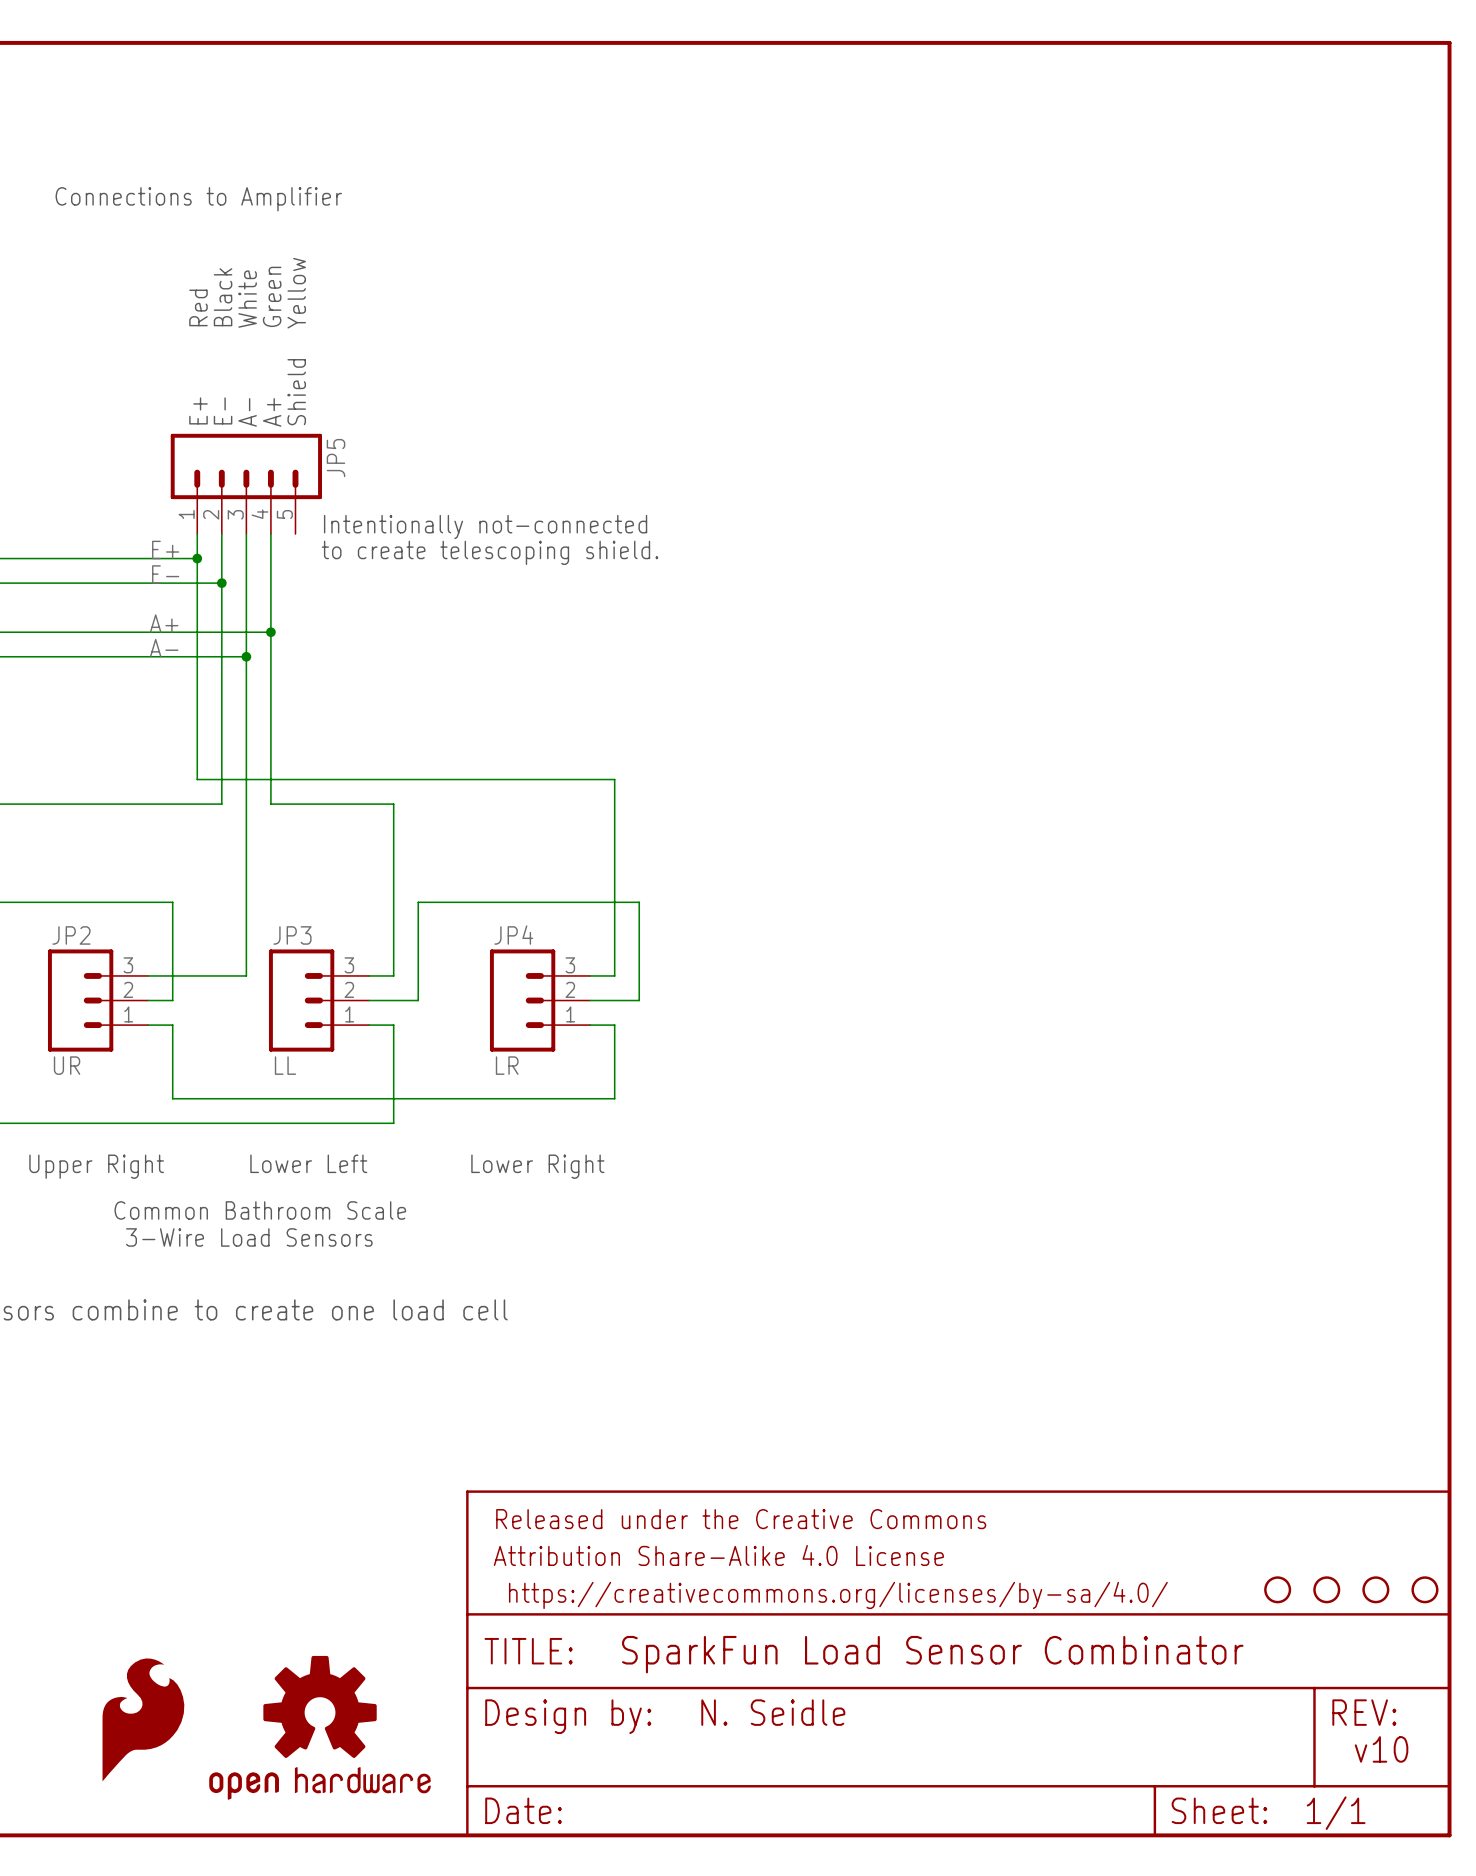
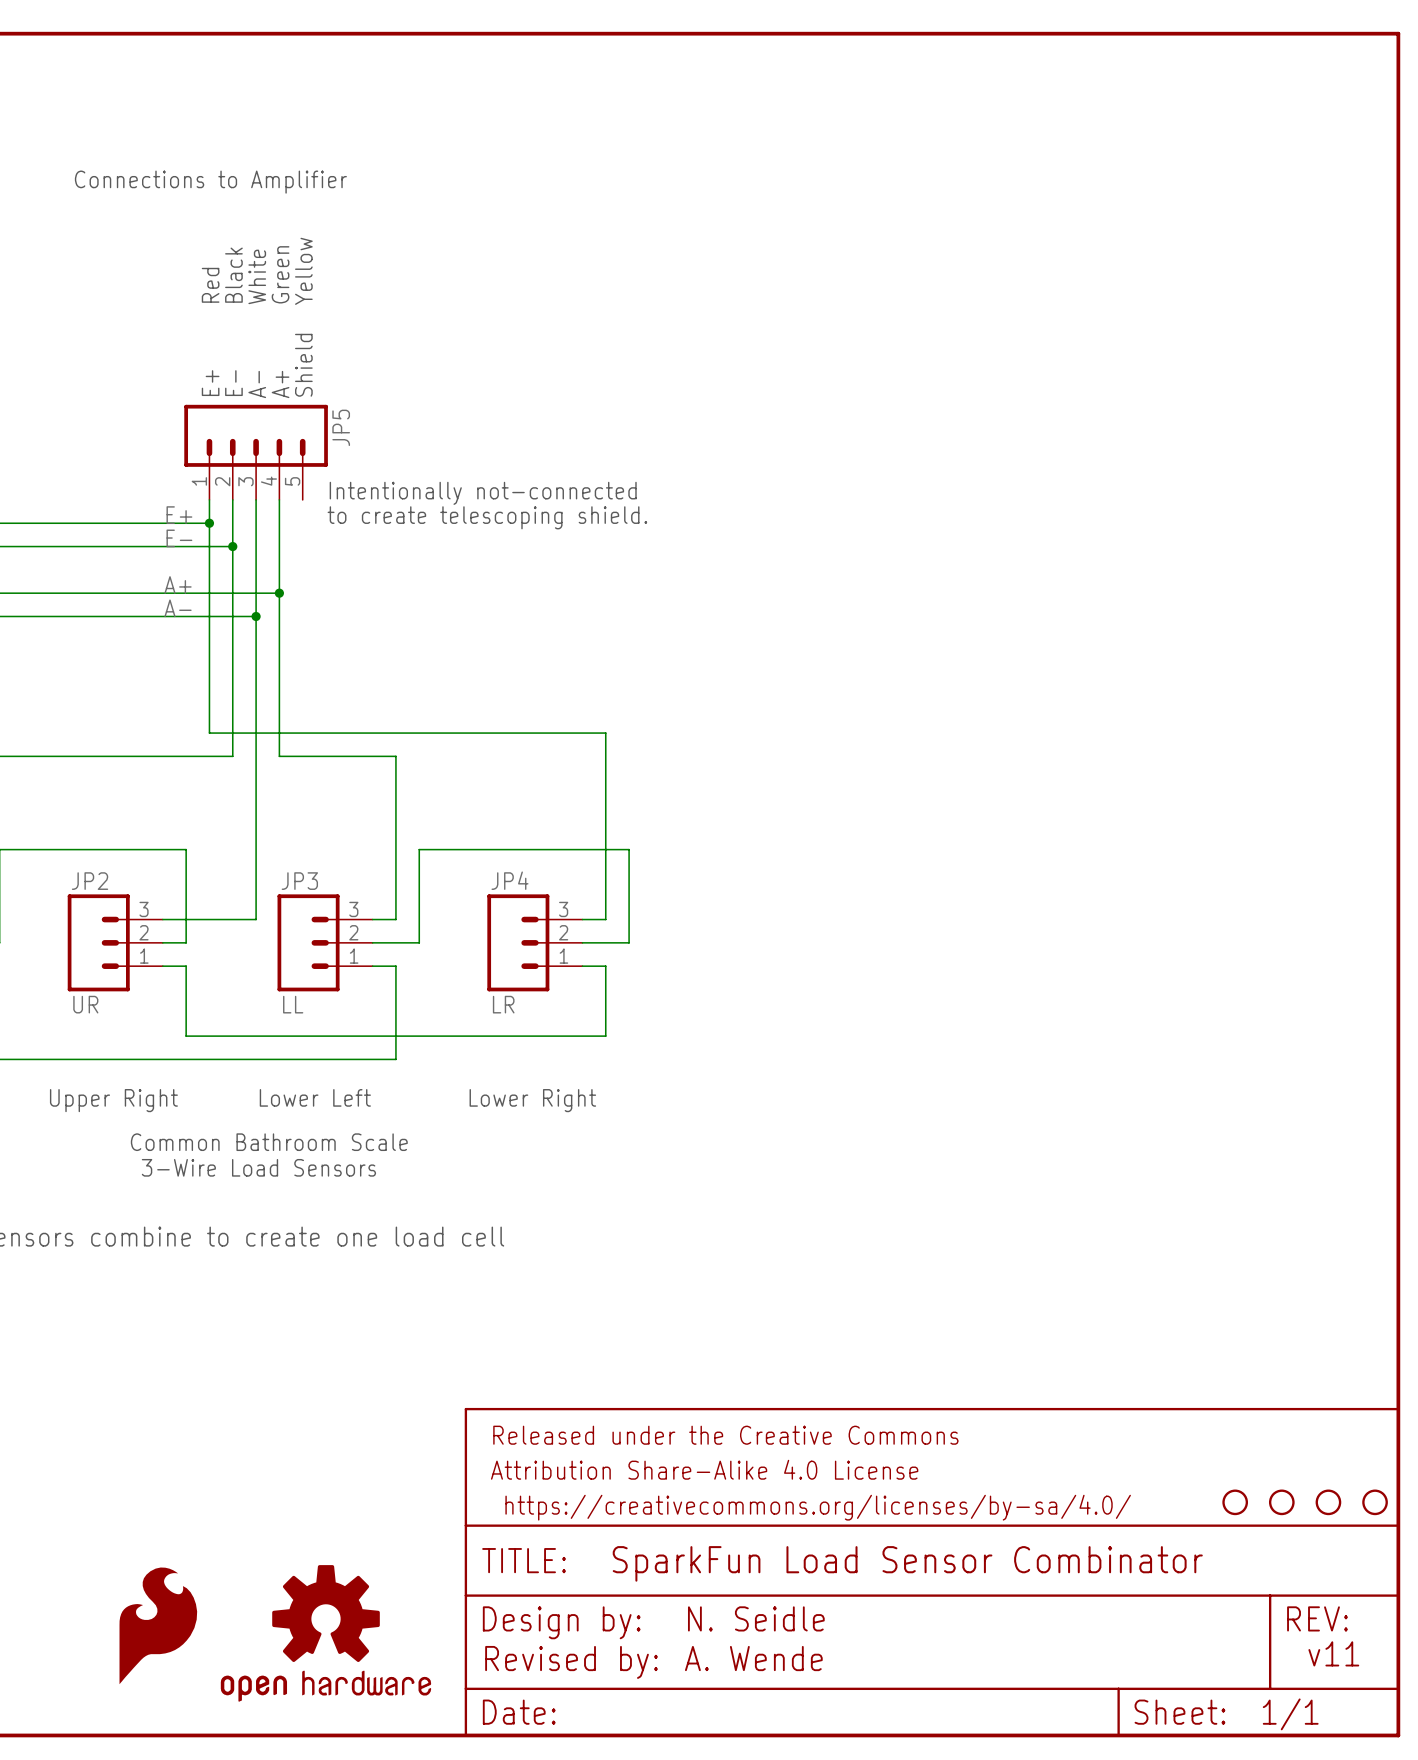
text: v10 (1381, 1749) -> v11 (1333, 1653)
text: none -> A. Wende (753, 1658)
text: none -> Revised by: (571, 1662)

